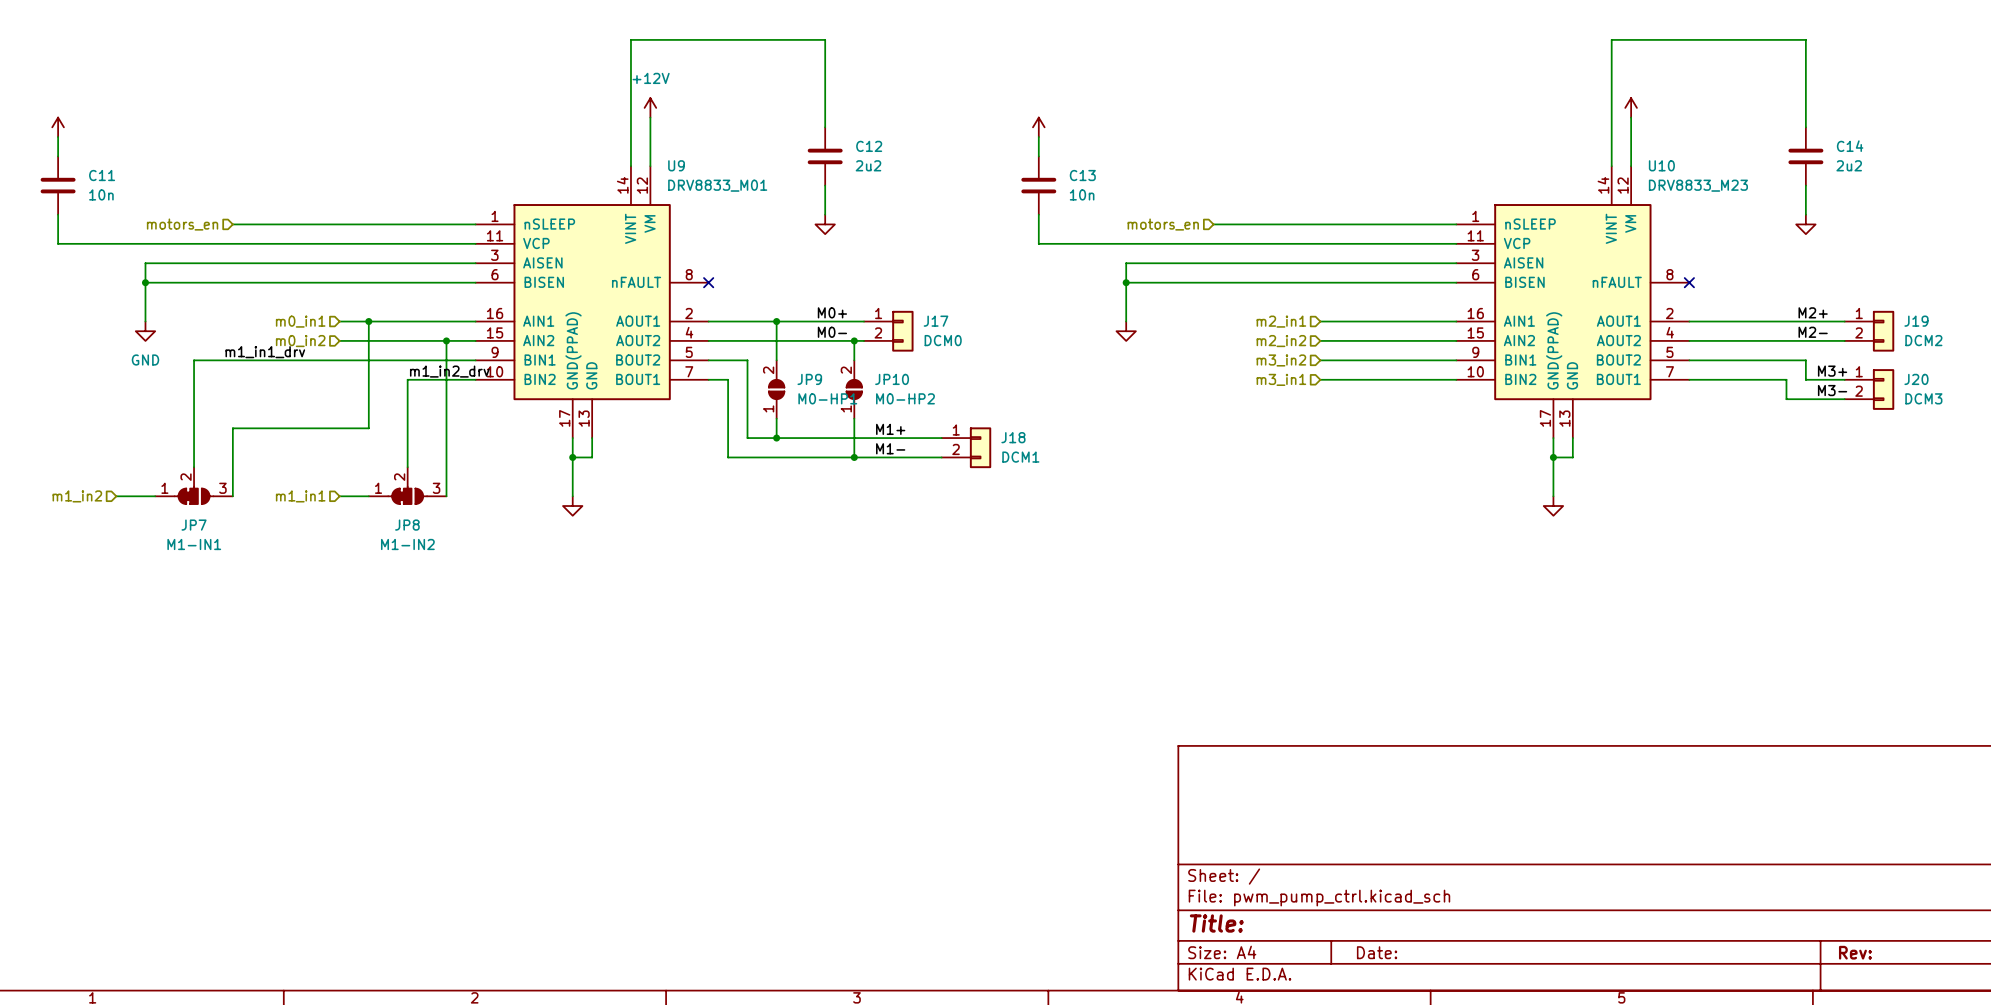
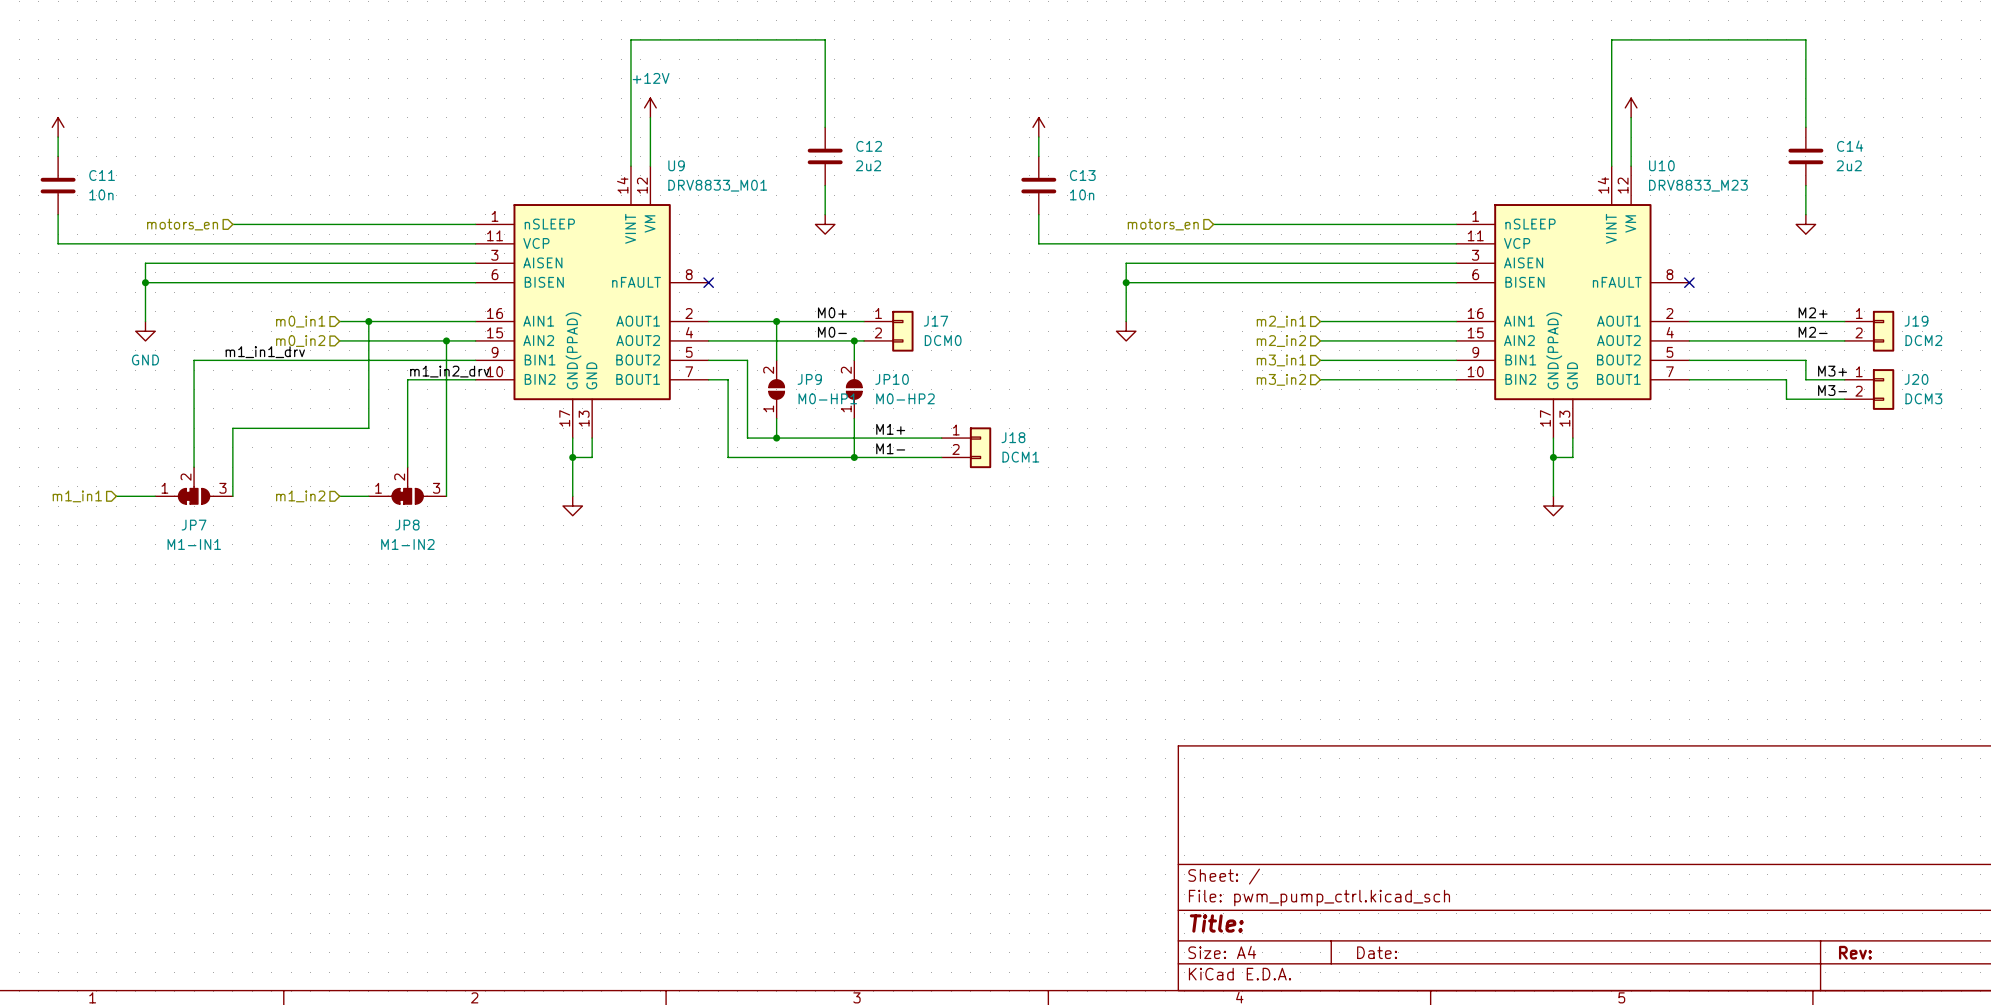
hierarchical label: m3_in2 (1281, 360) -> m3_in1 (1281, 360)
hierarchical label: m3_in1 (1281, 379) -> m3_in2 (1281, 379)
hierarchical label: m1_in2 (77, 496) -> m1_in1 (77, 496)
hierarchical label: m1_in1 (300, 496) -> m1_in2 (300, 496)

